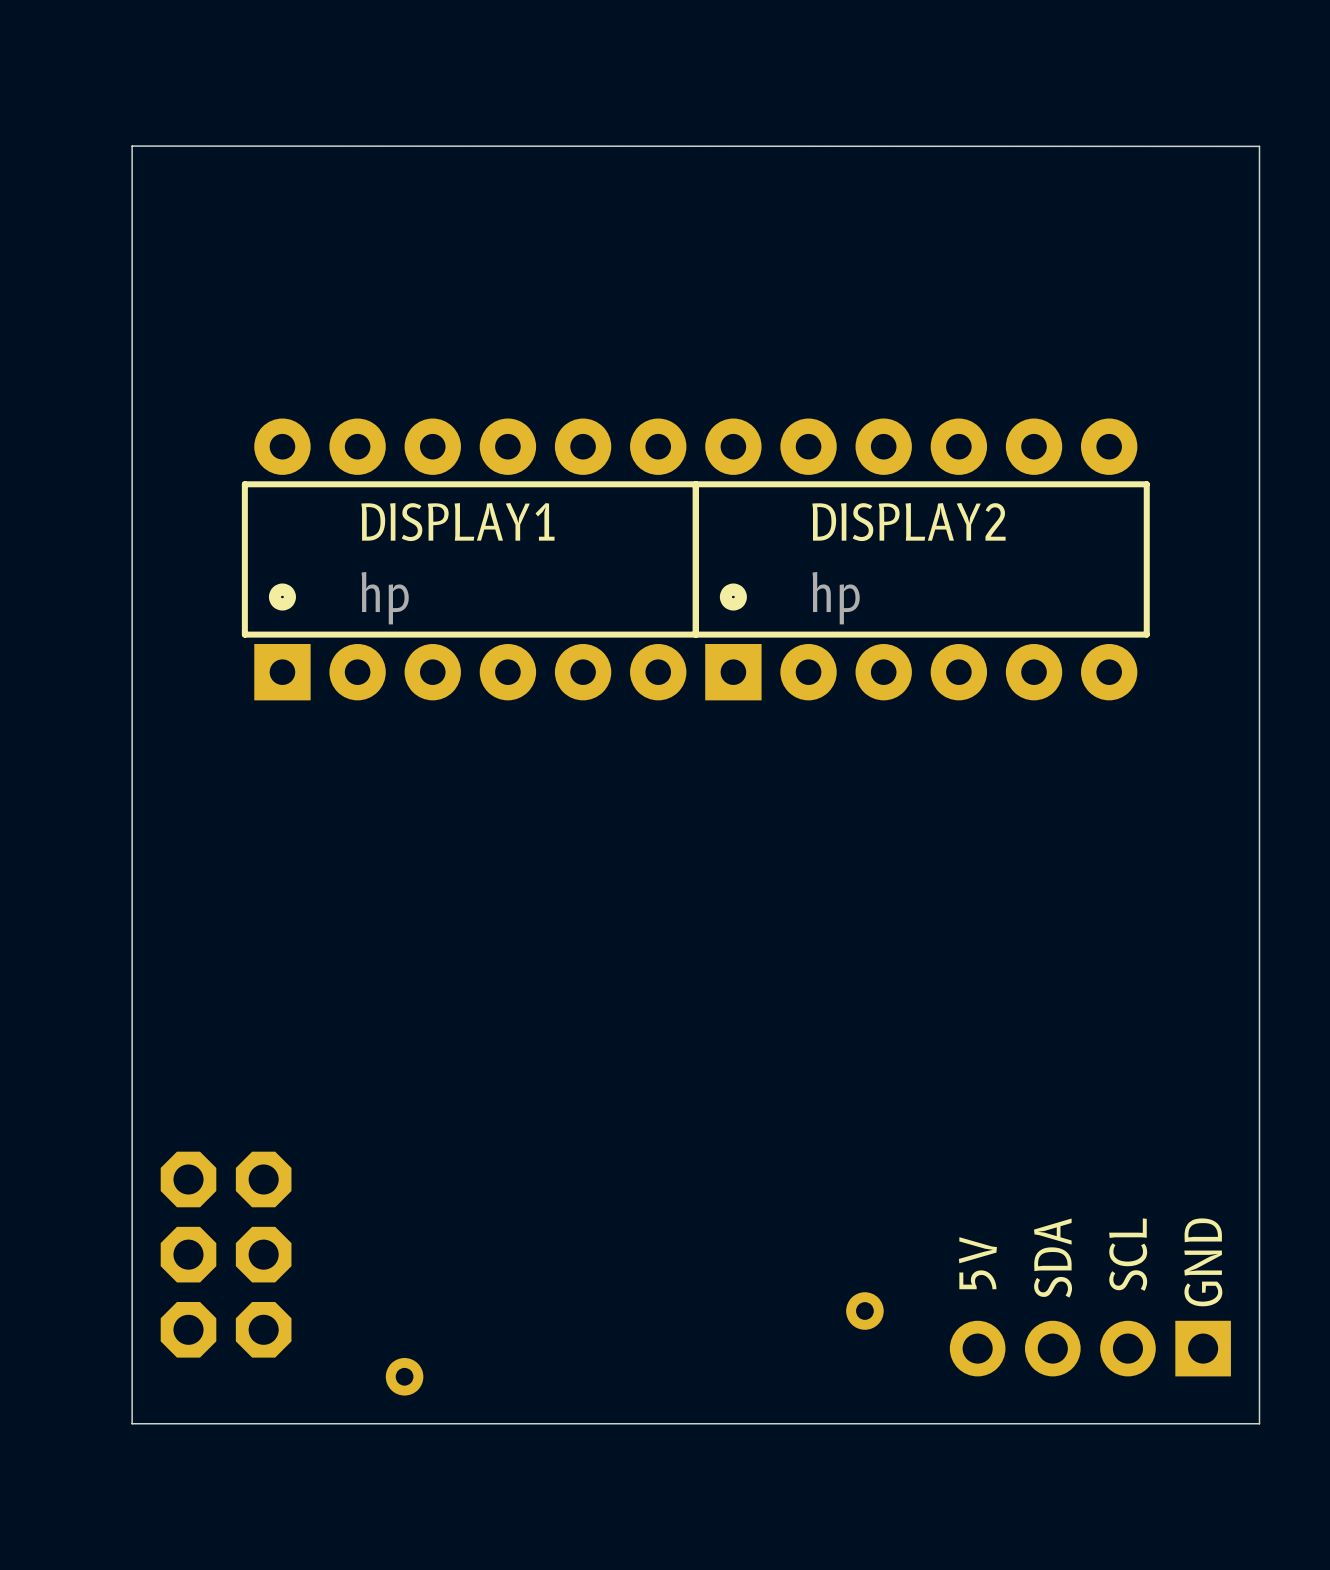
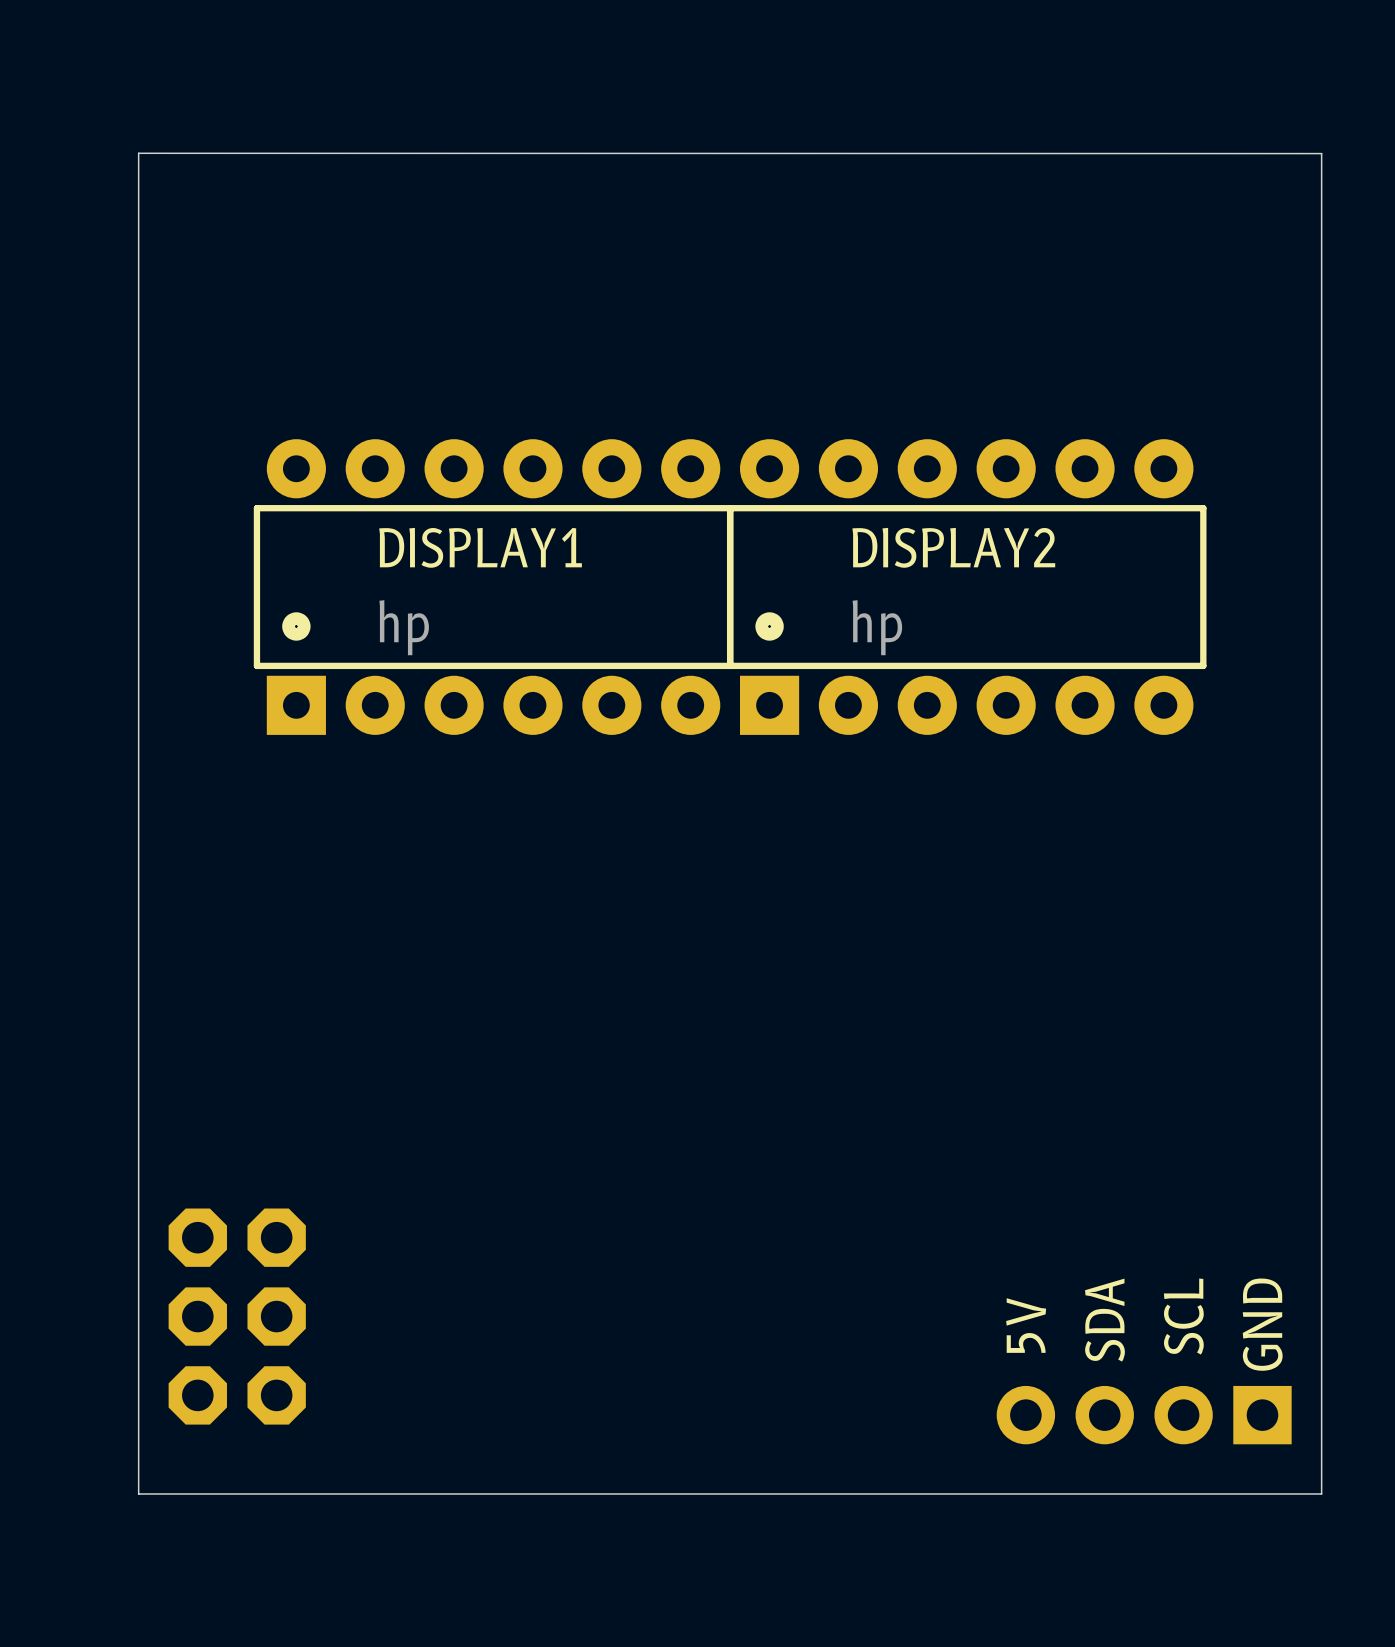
part: (864, 1311) -> none
part: (404, 1376) -> none

